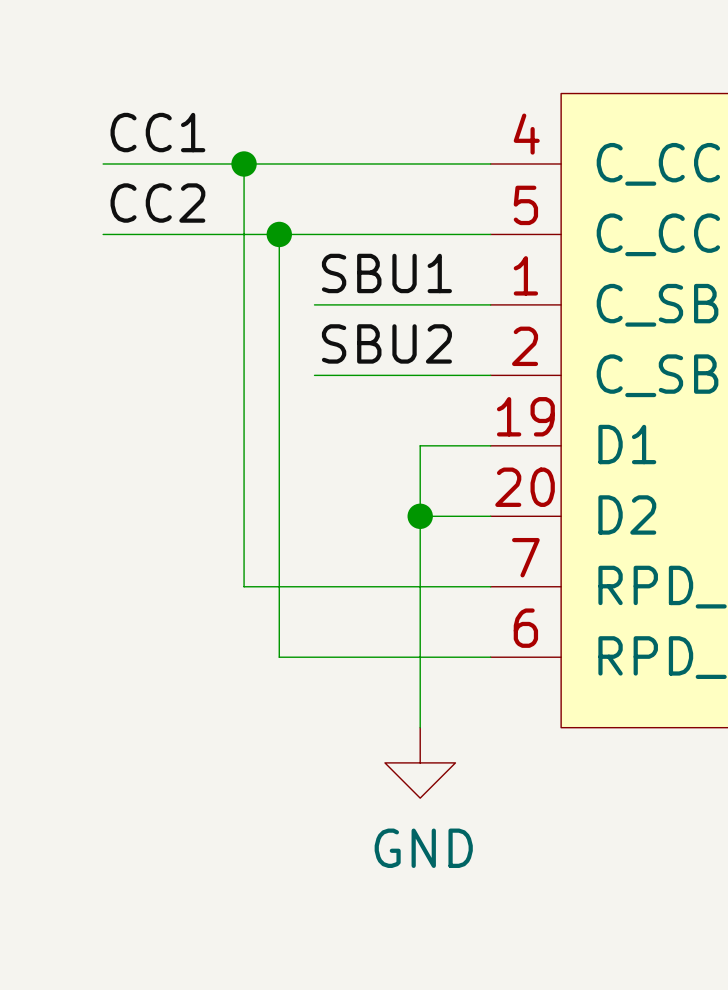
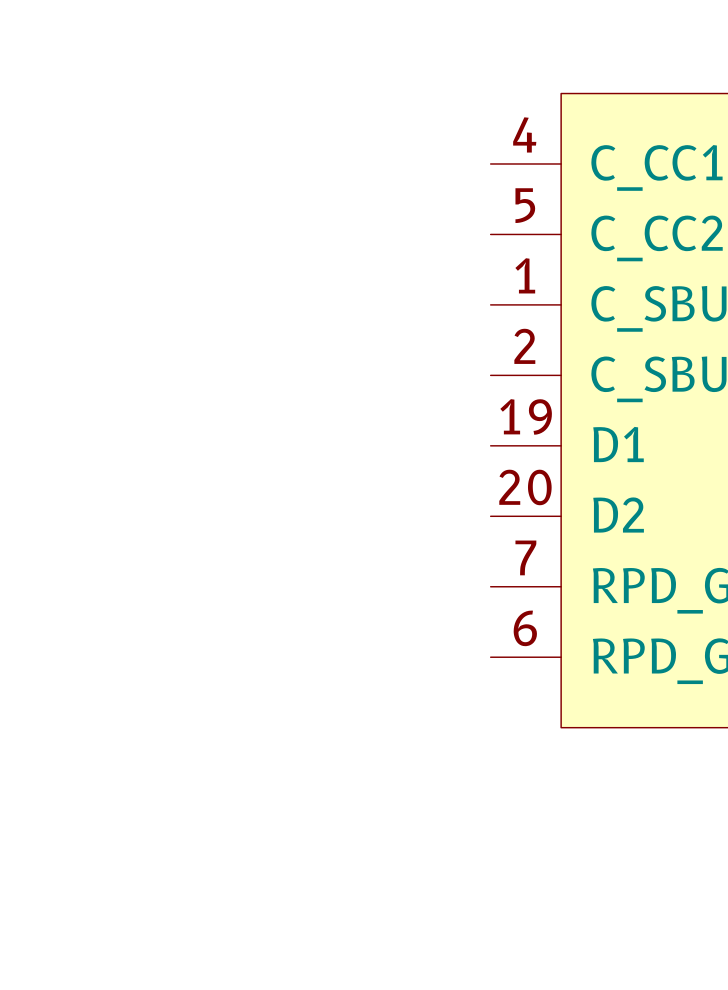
label: CC1 (157, 132) -> none
wire: (103, 163) (490, 163) -> none
wire: (244, 163) (244, 586) (490, 586) -> none
junction: (244, 163) -> none
label: CC2 (157, 203) -> none
wire: (103, 234) (490, 234) -> none
wire: (279, 234) (279, 657) (490, 657) -> none
junction: (279, 234) -> none
label: SBU1 (386, 273) -> none
wire: (314, 304) (490, 304) -> none
label: SBU2 (386, 343) -> none
wire: (314, 375) (490, 375) -> none
wire: (490, 445) (420, 445) (420, 727) -> none
wire: (420, 516) (490, 516) -> none
junction: (420, 516) -> none
power symbol: GND (420, 762) -> none

